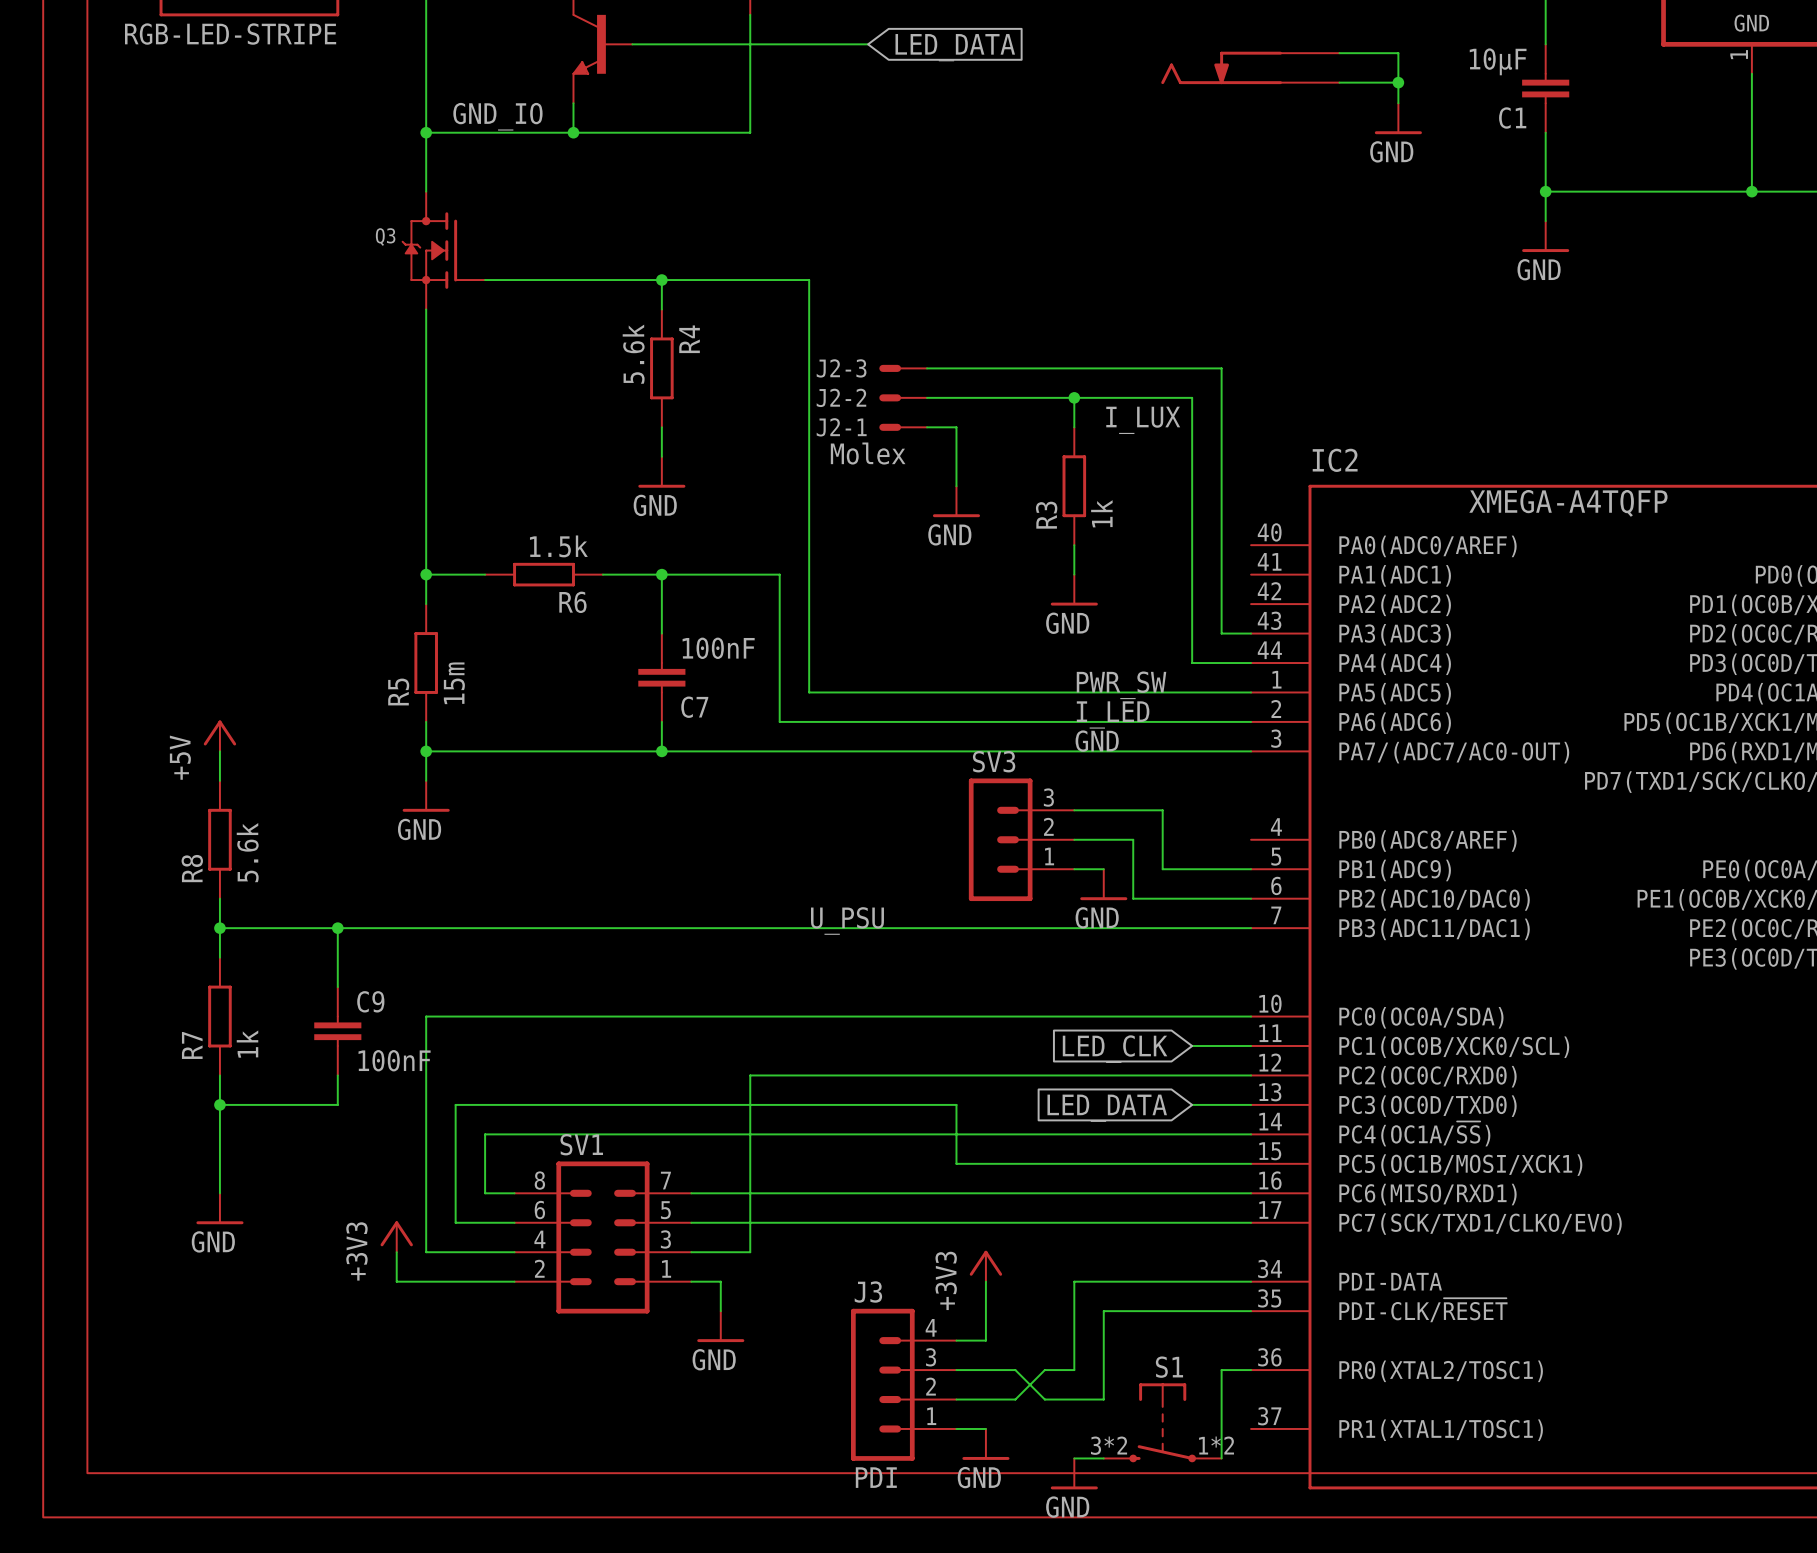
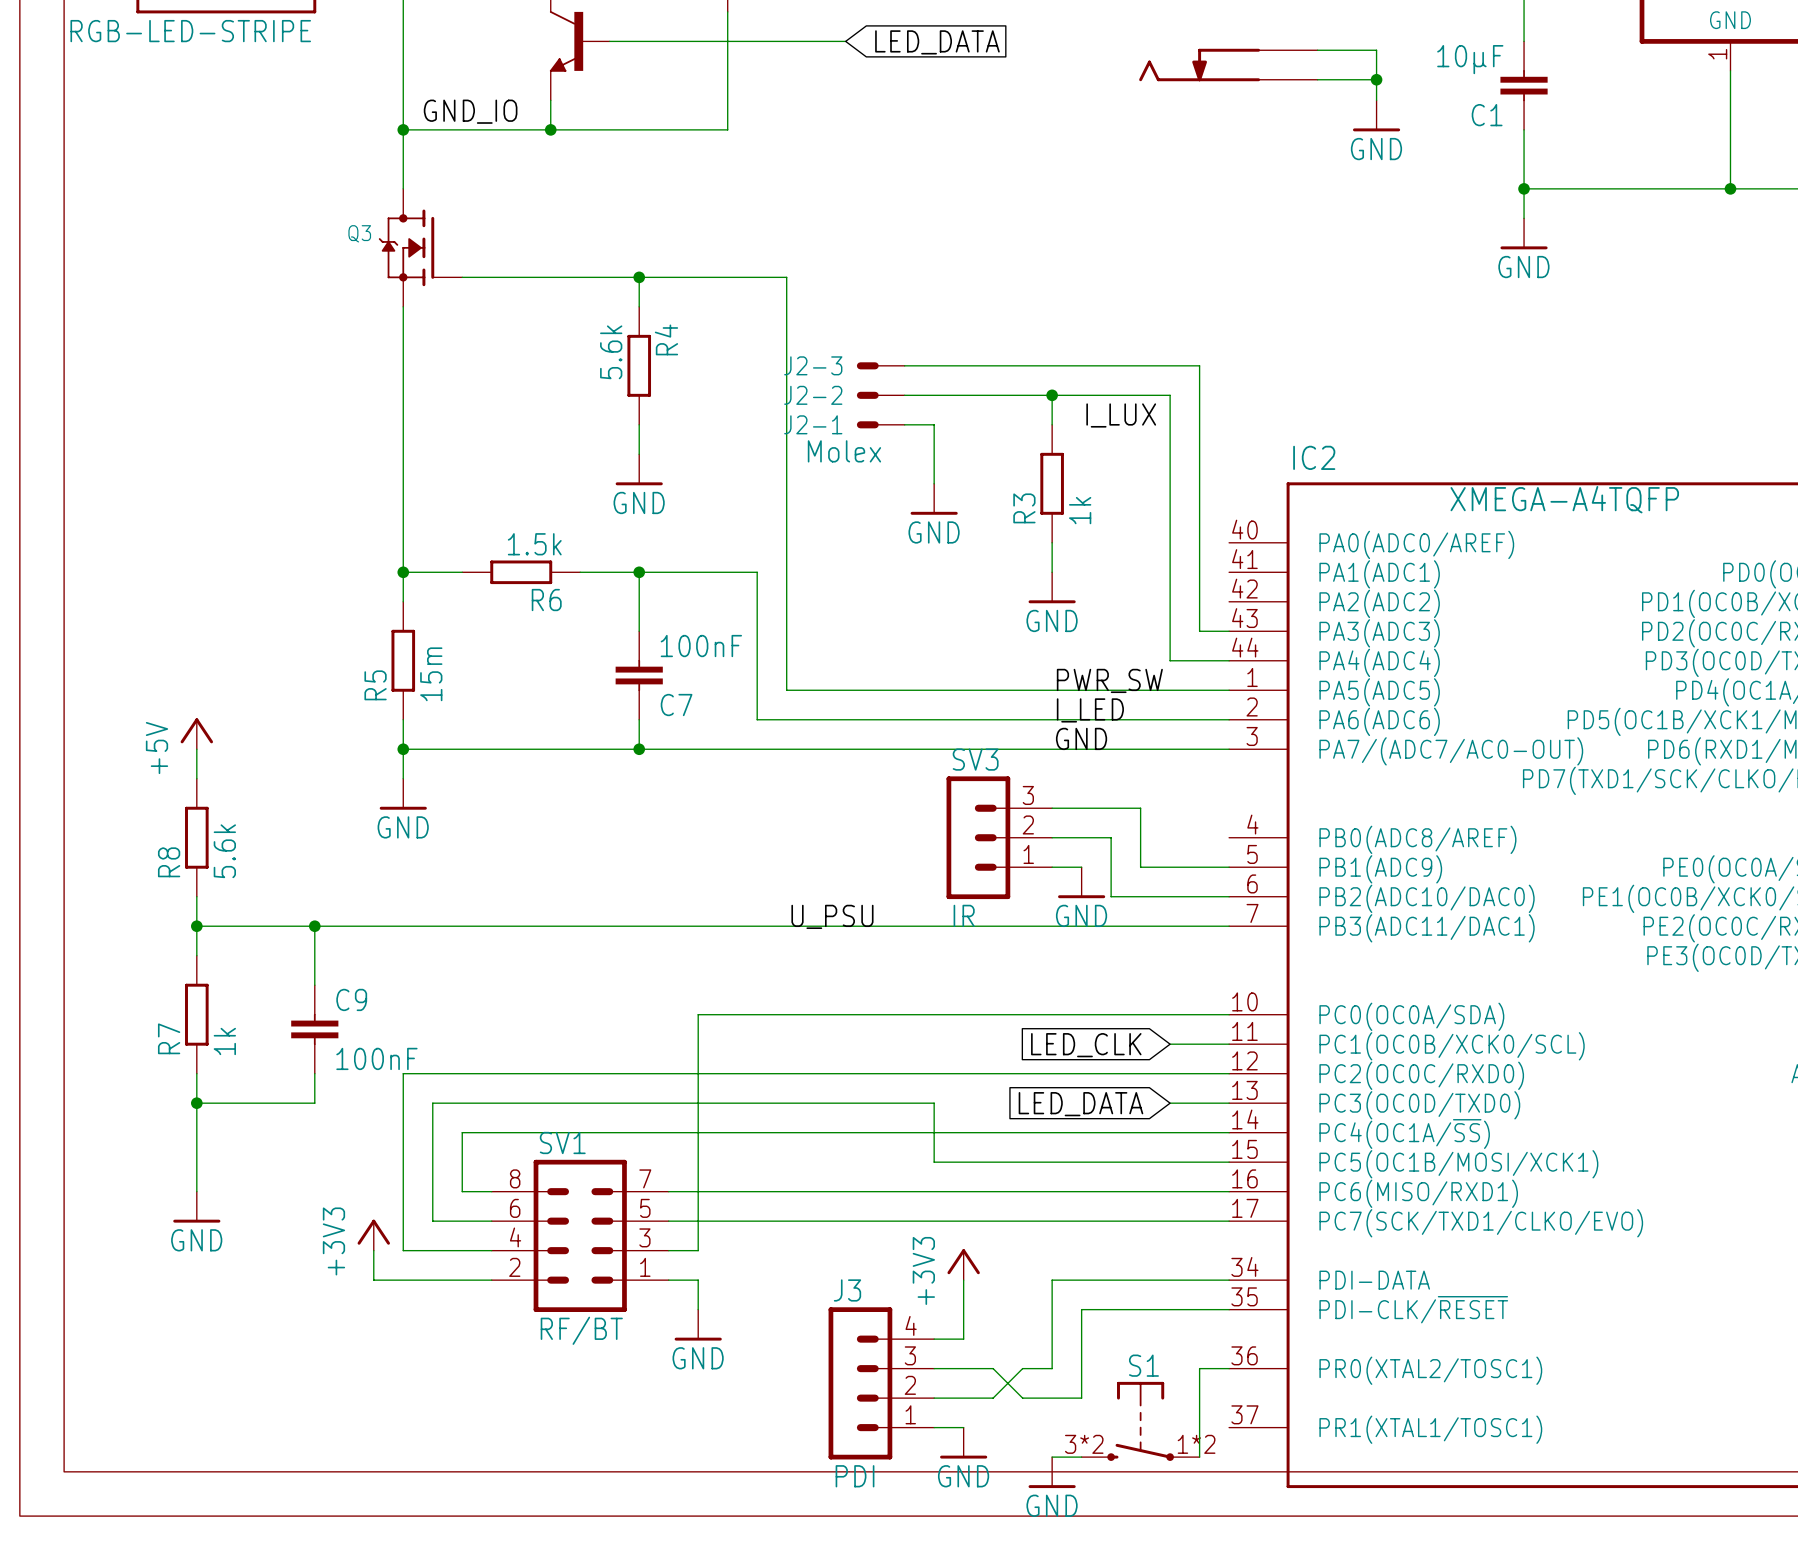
SV3 value: none -> IR (964, 915)
wire: (720, 1016) (426, 1016) (426, 1075) -> (727, 1073) (403, 1073)
wire: (750, 1075) (750, 1252) (720, 1252) -> (698, 1014) (698, 1250)
SV1 value: none -> RF/BT (581, 1330)

